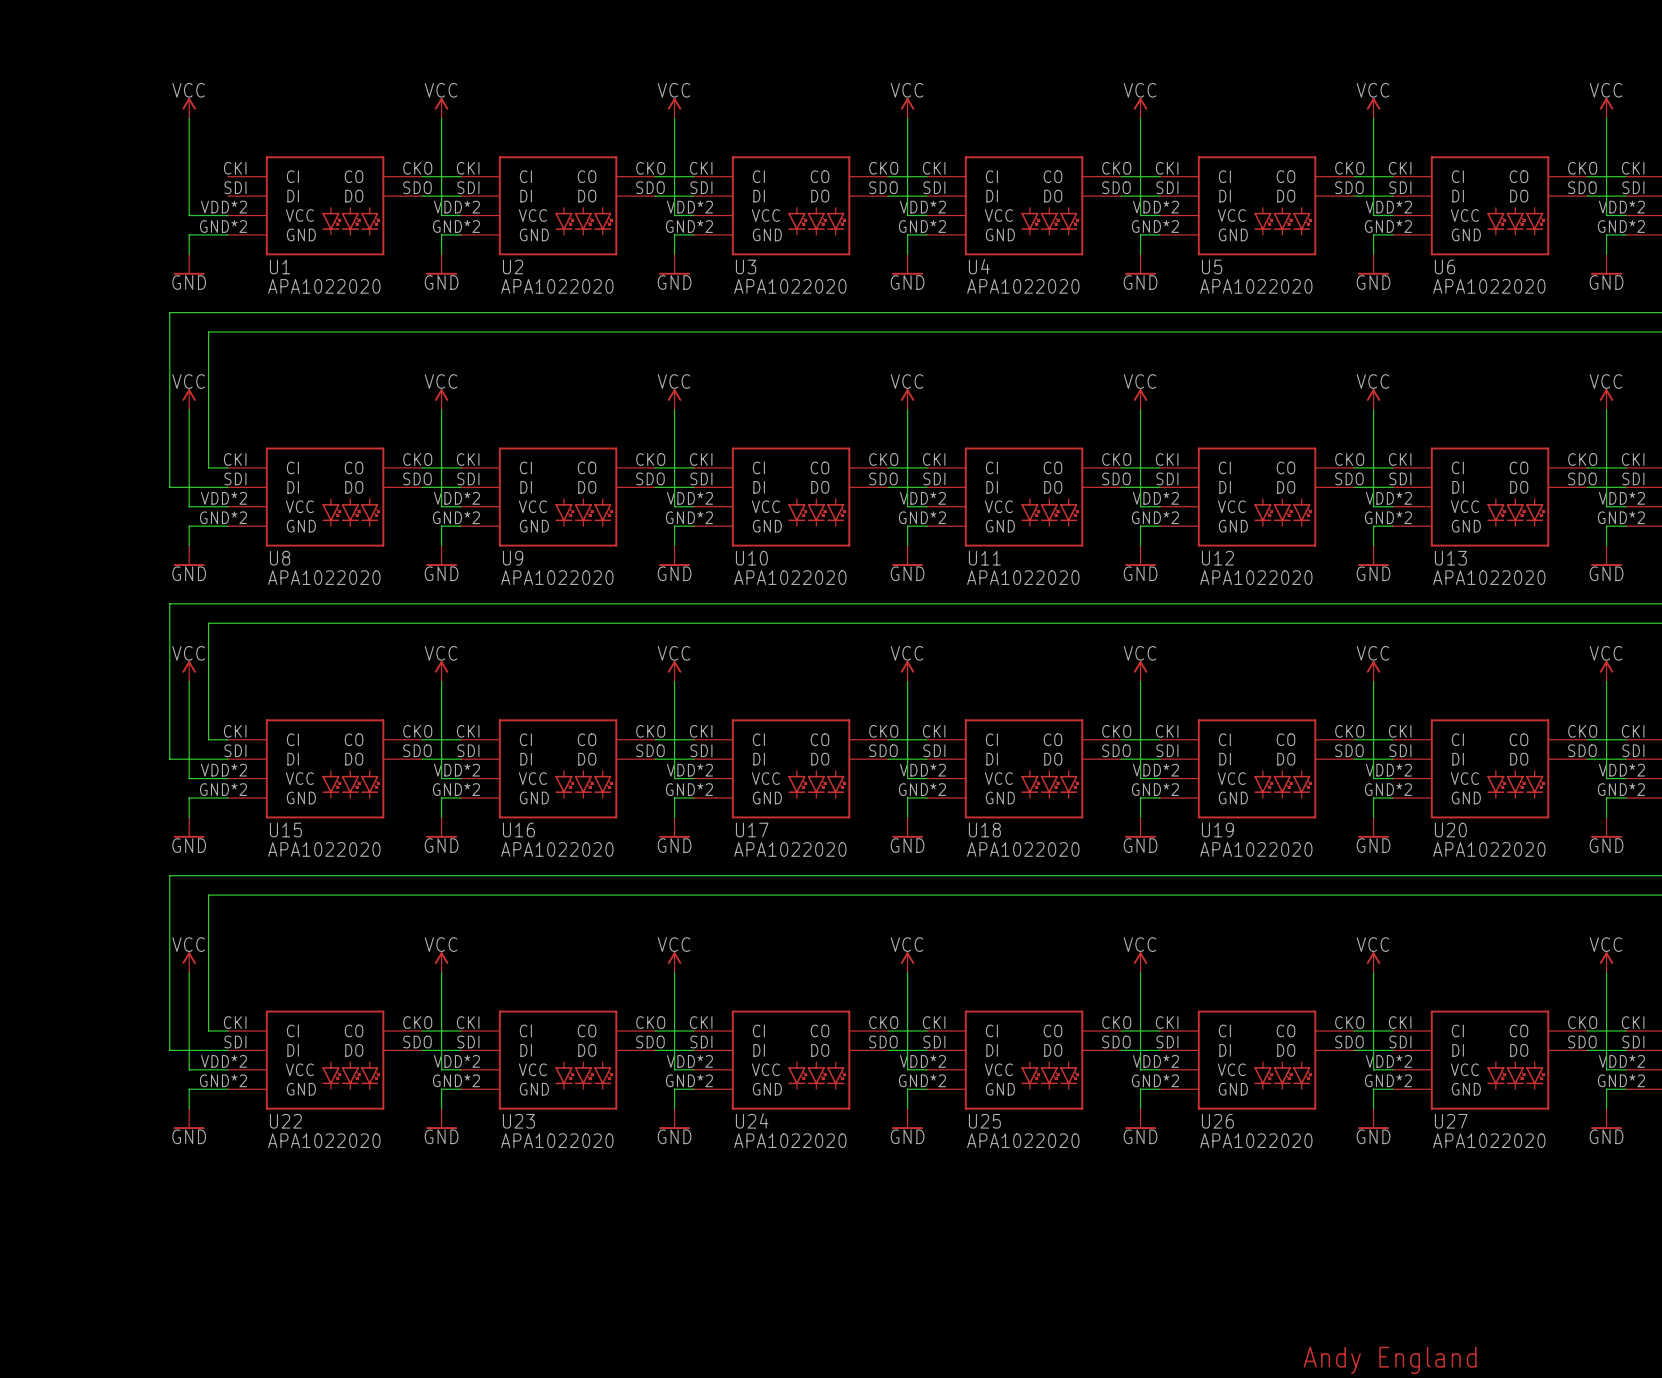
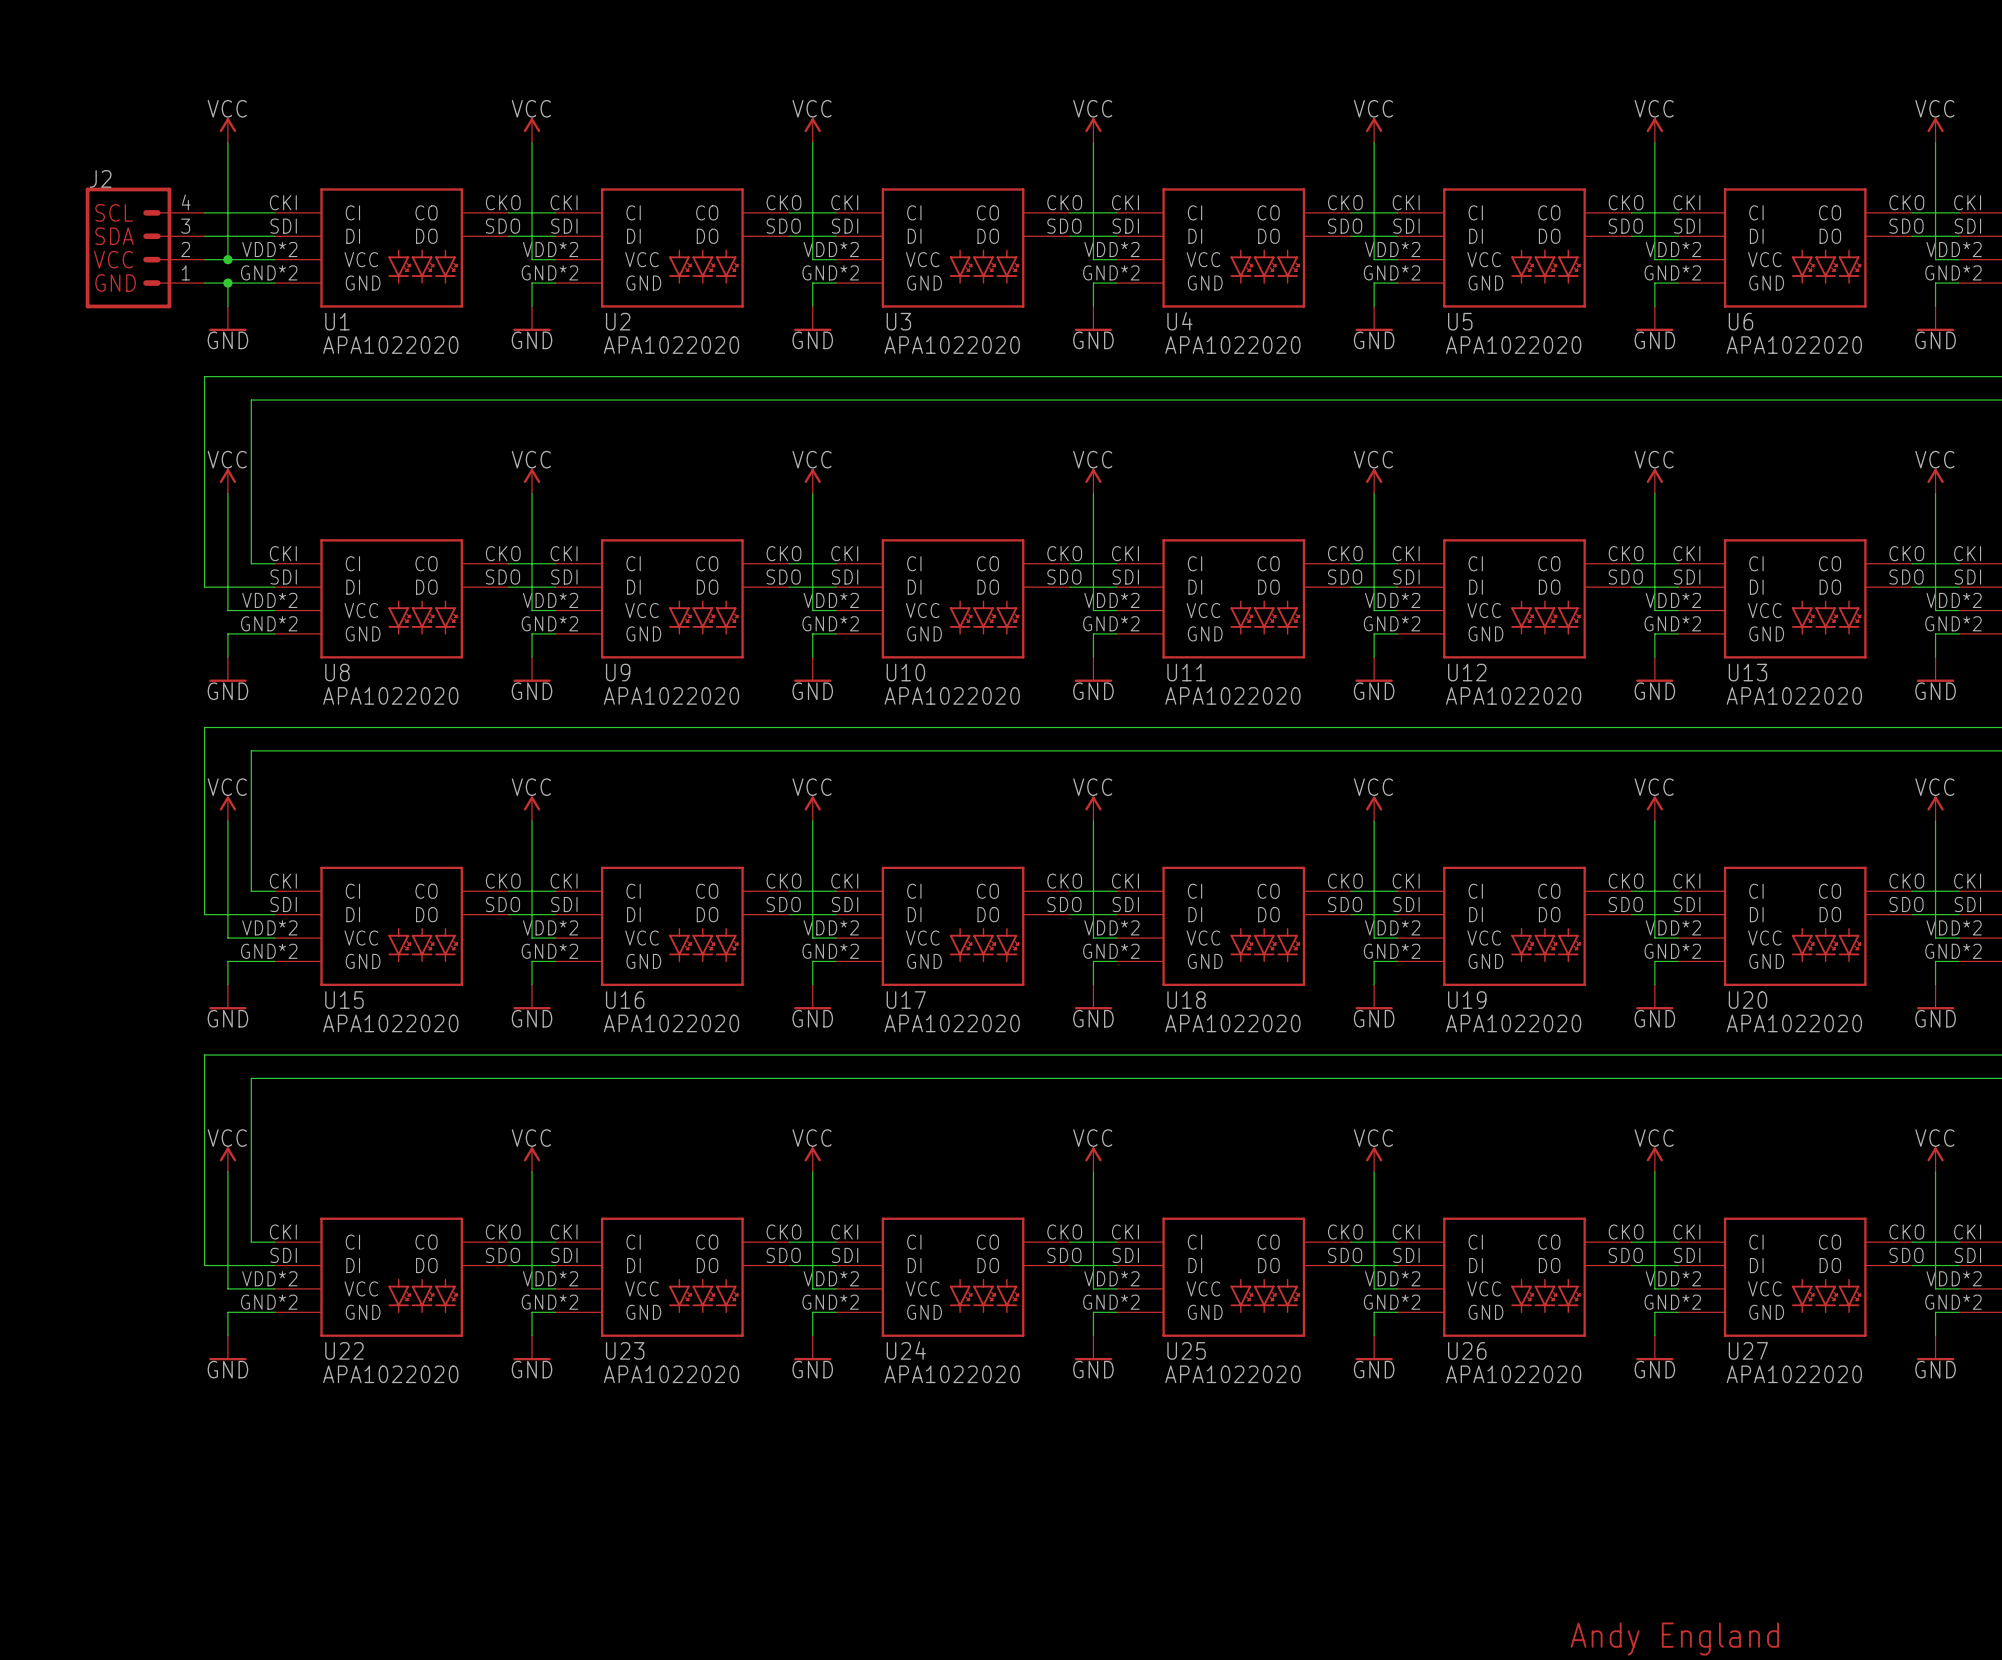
wire: none -> (204, 212) (274, 212)
wire: none -> (204, 236) (274, 236)
J2: none -> (145, 247)
wire: none -> (204, 259) (227, 259)
junction: none -> (227, 259)
wire: none -> (204, 283) (227, 283)
junction: none -> (227, 283)

